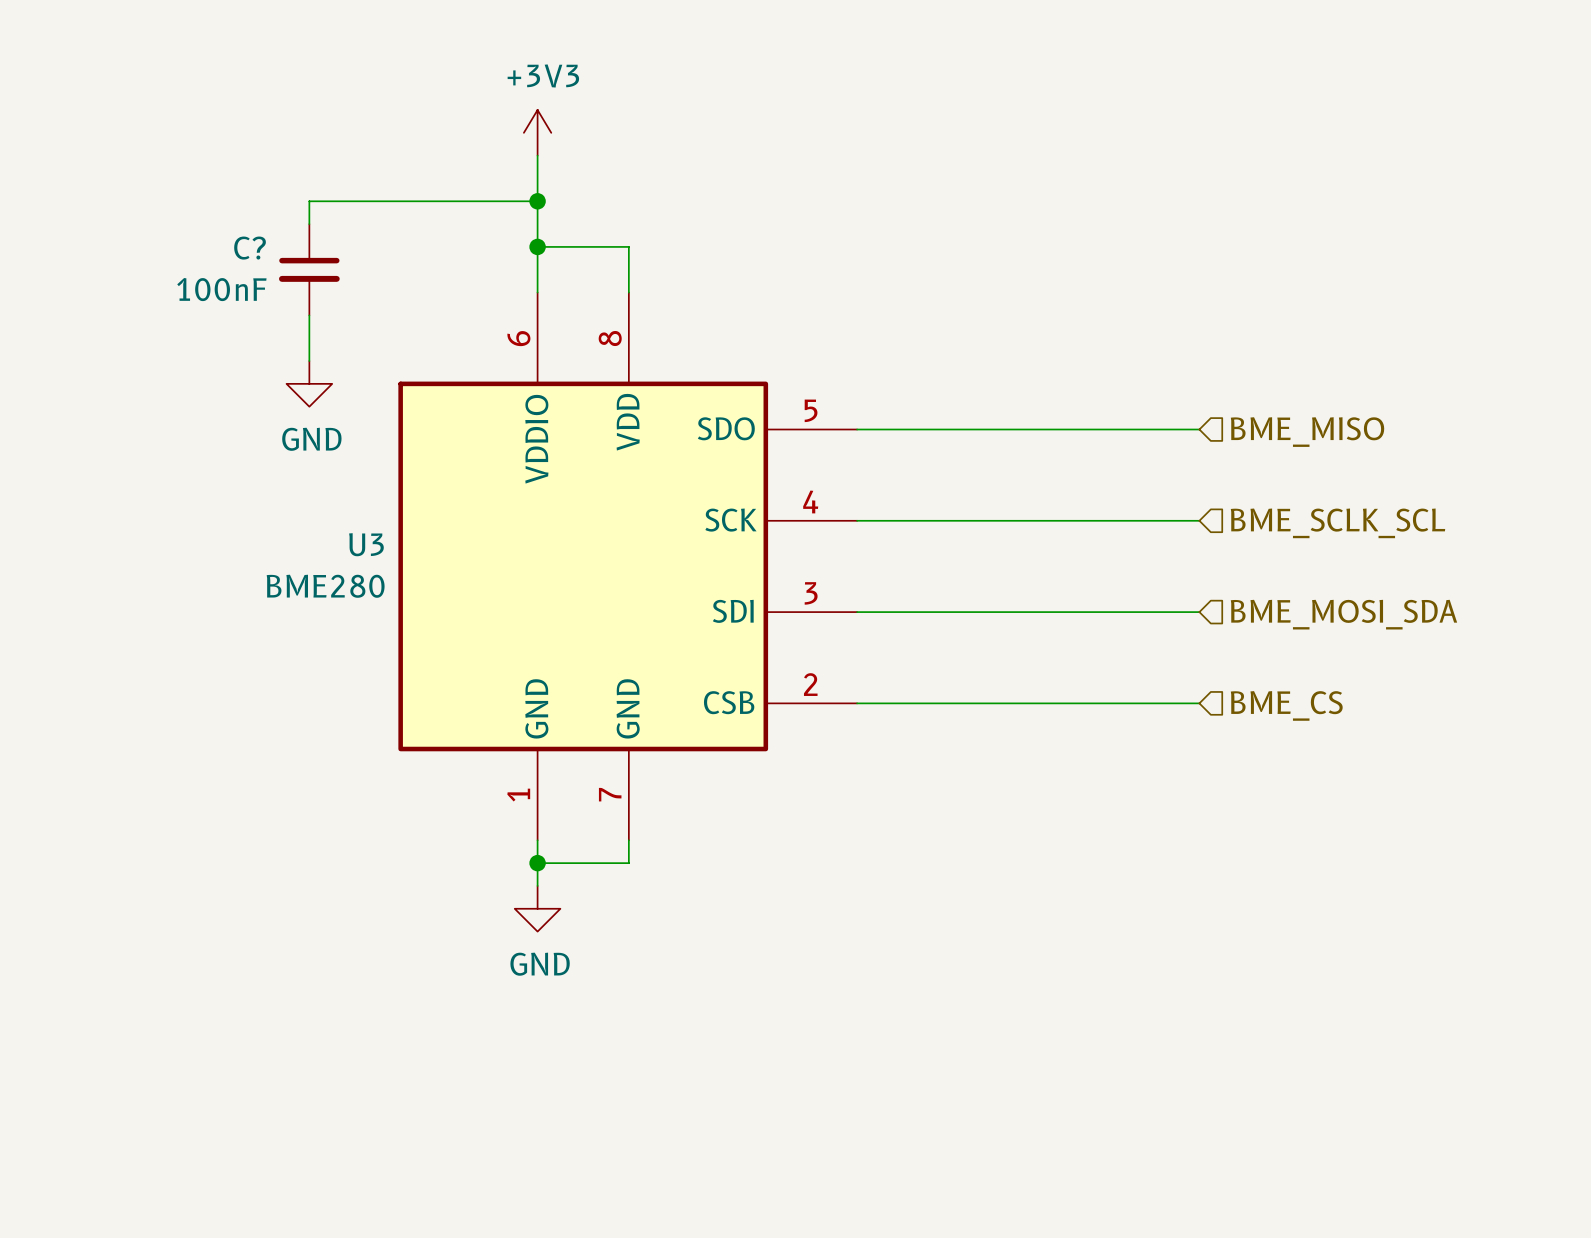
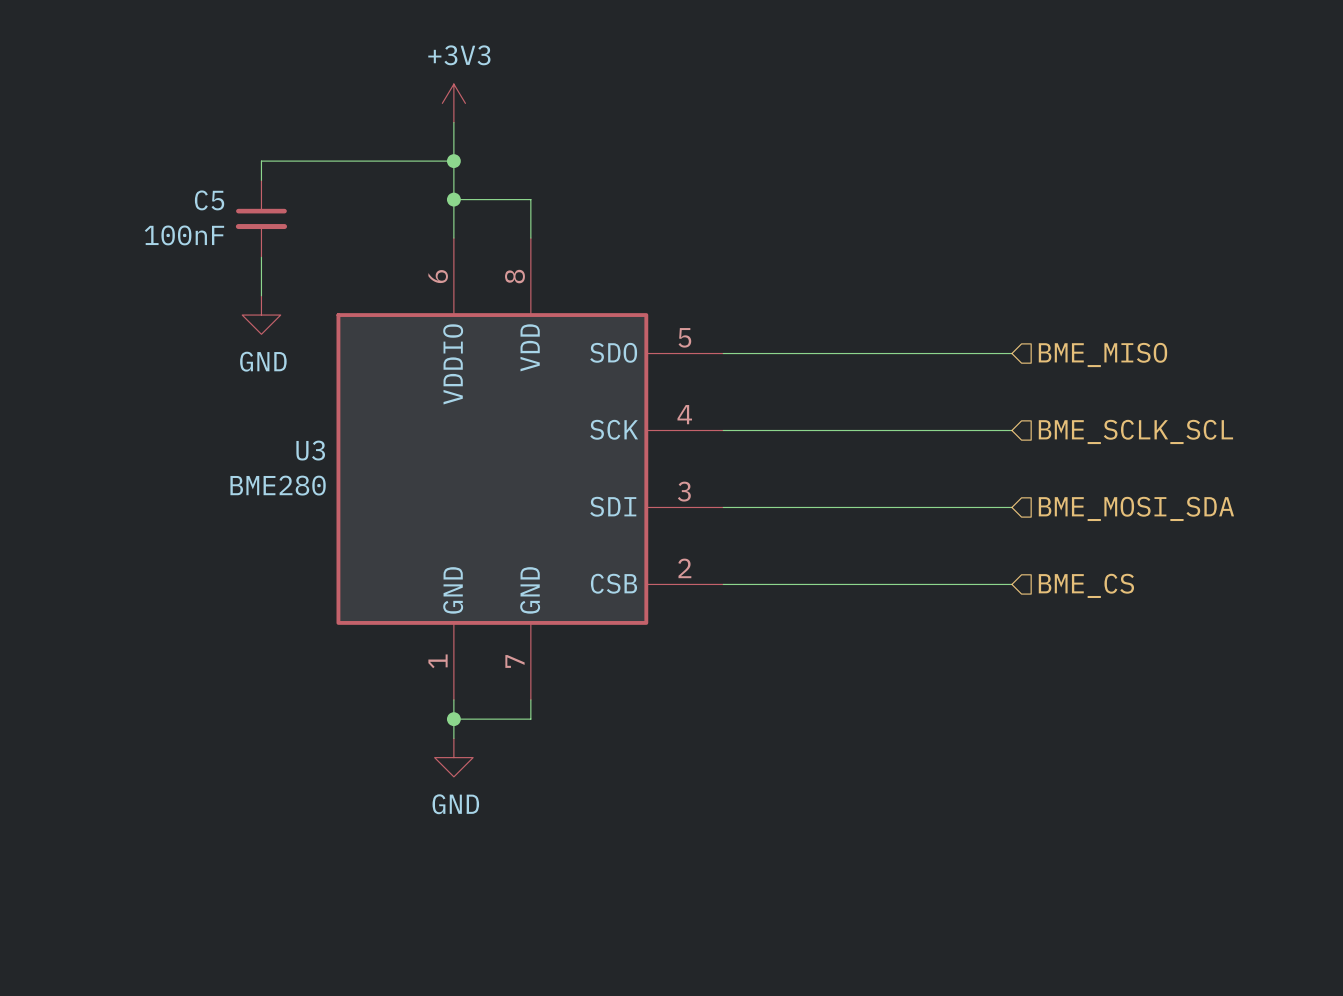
C? name: C? (250, 248) -> C5 (209, 200)

